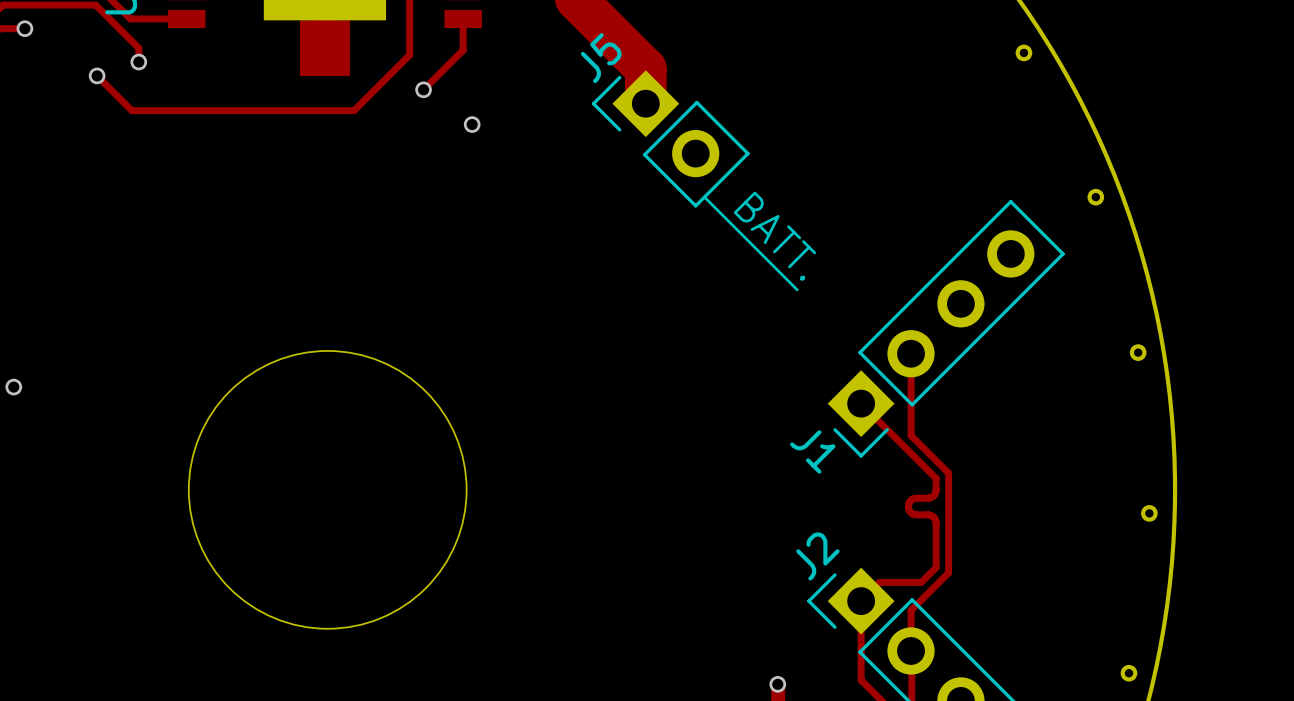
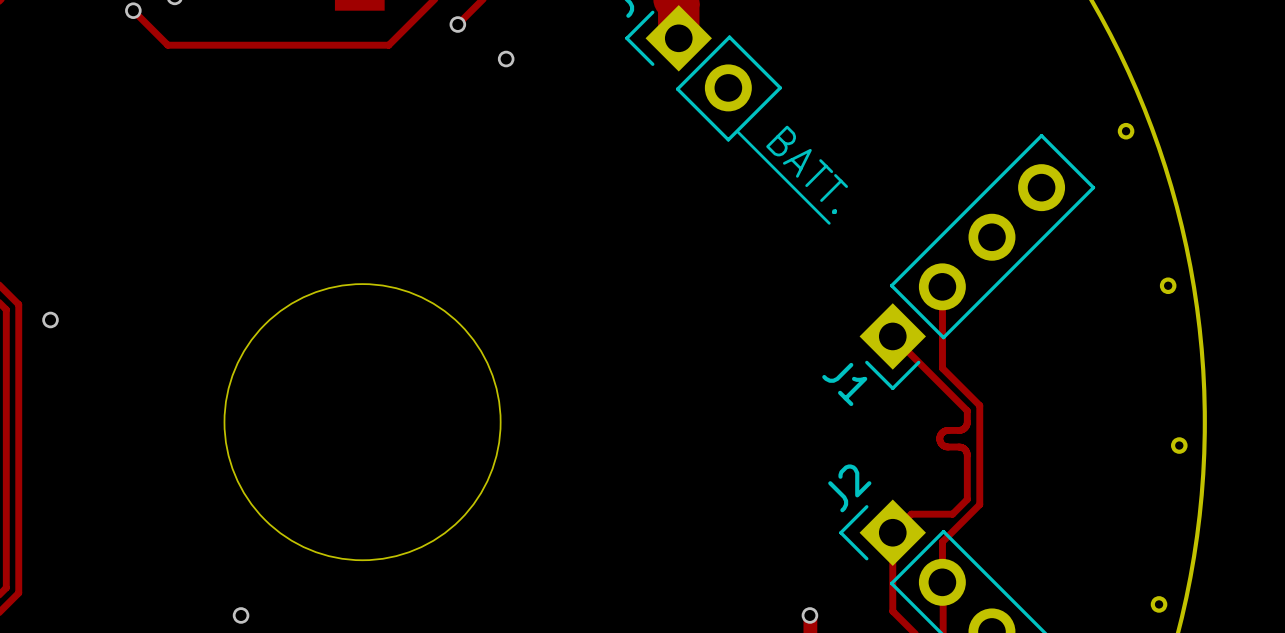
via: none -> (241, 615)

